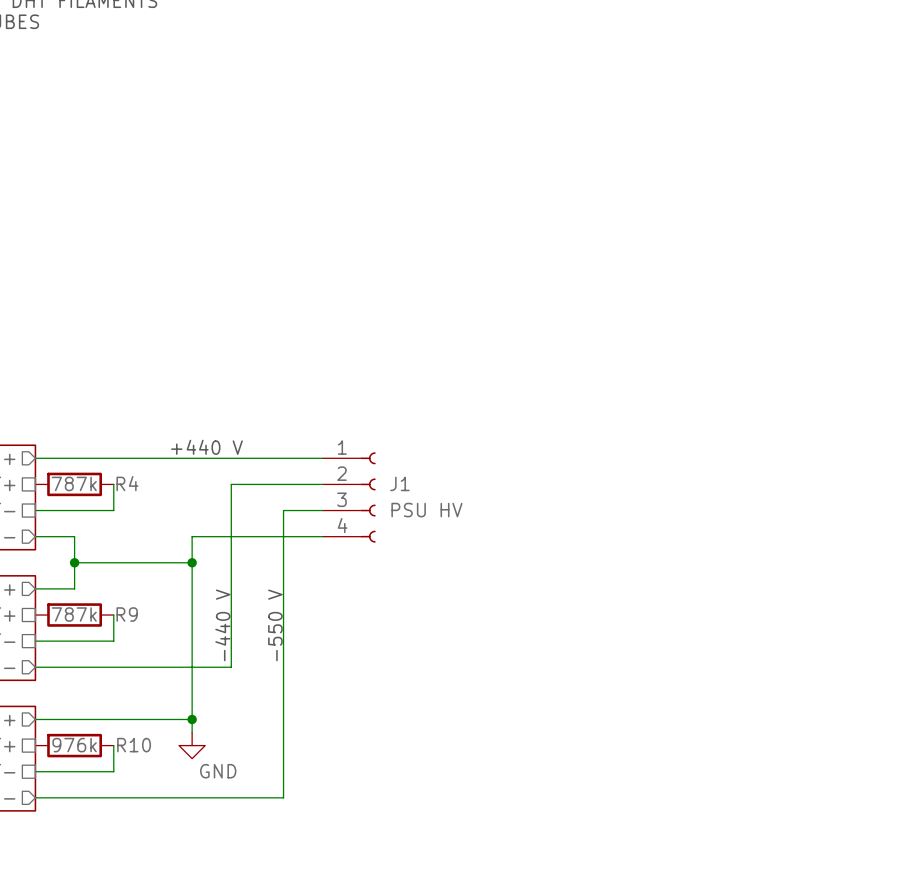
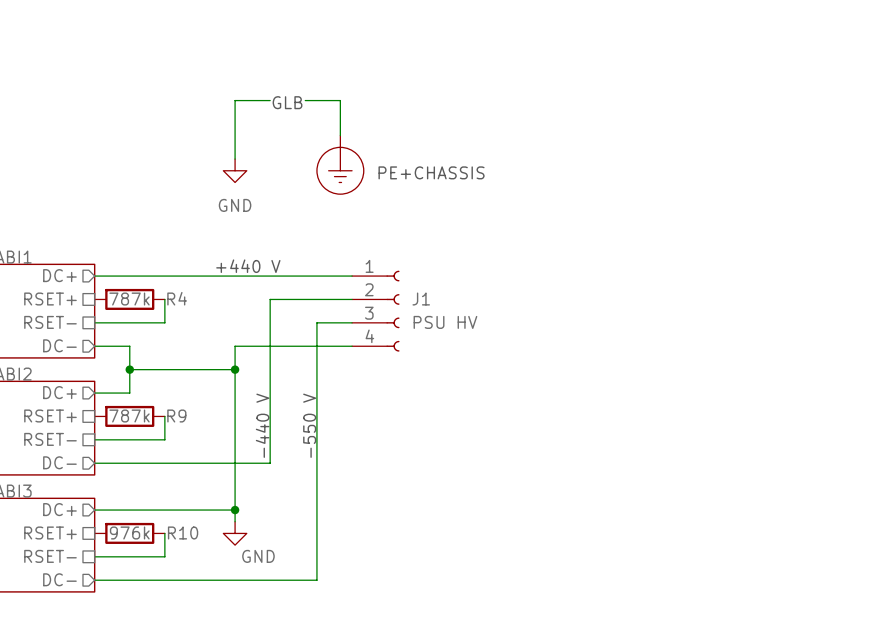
wire: none -> (270, 100) (235, 100) (235, 159)
wire: none -> (305, 100) (340, 100) (340, 135)
text: none -> GLB (287, 102)
power symbol: none -> (340, 164)
power symbol: none -> GND (235, 170)
text: none -> PE+CHASSIS (431, 172)

